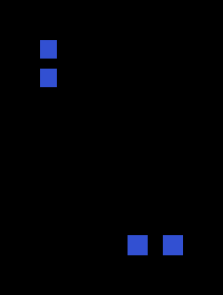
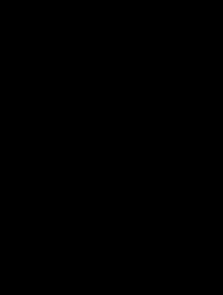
part: (48, 63) -> none
part: (155, 245) -> none

